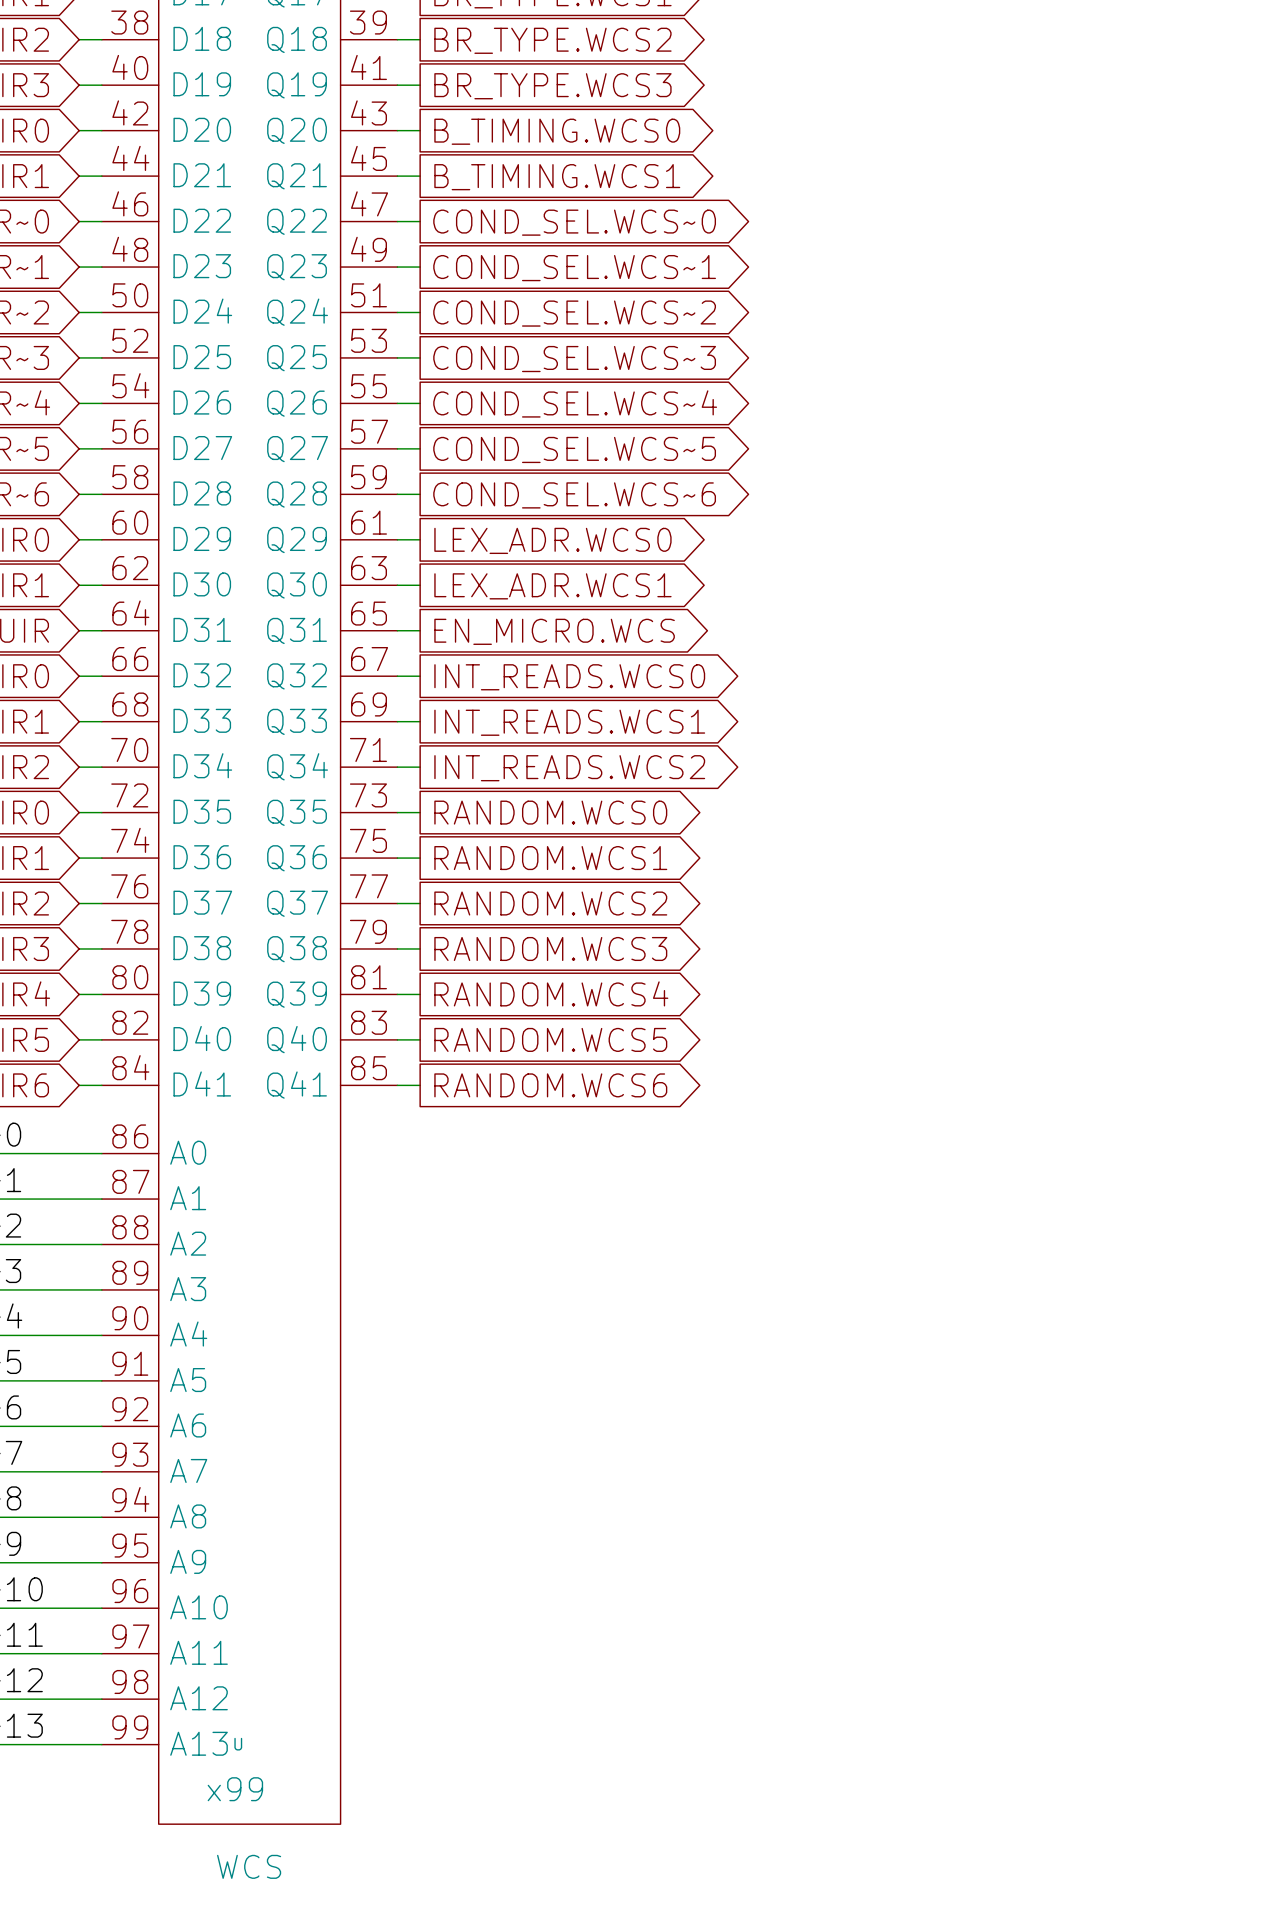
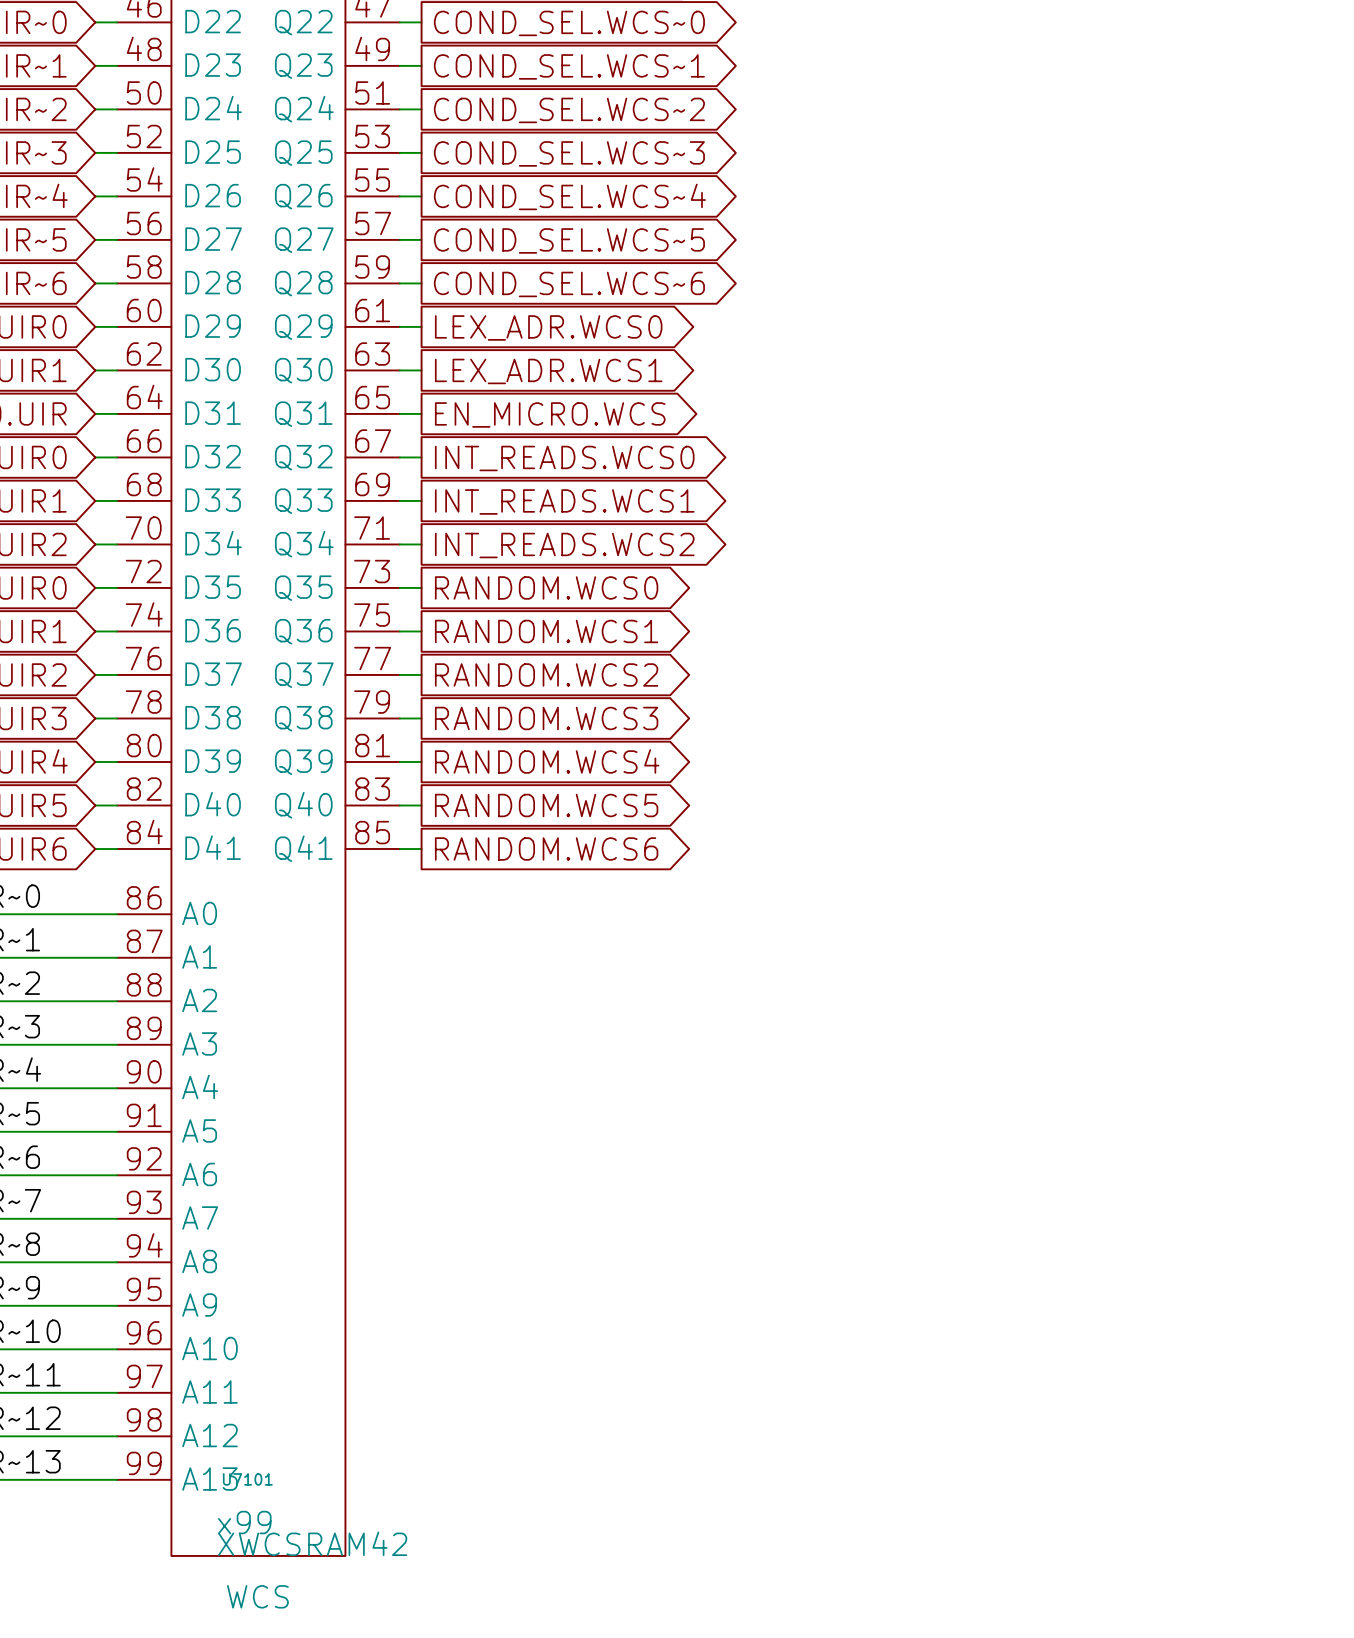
U name: U (238, 1744) -> U7101 (247, 1479)
U value: none -> XWCSRAM42 (312, 1543)

